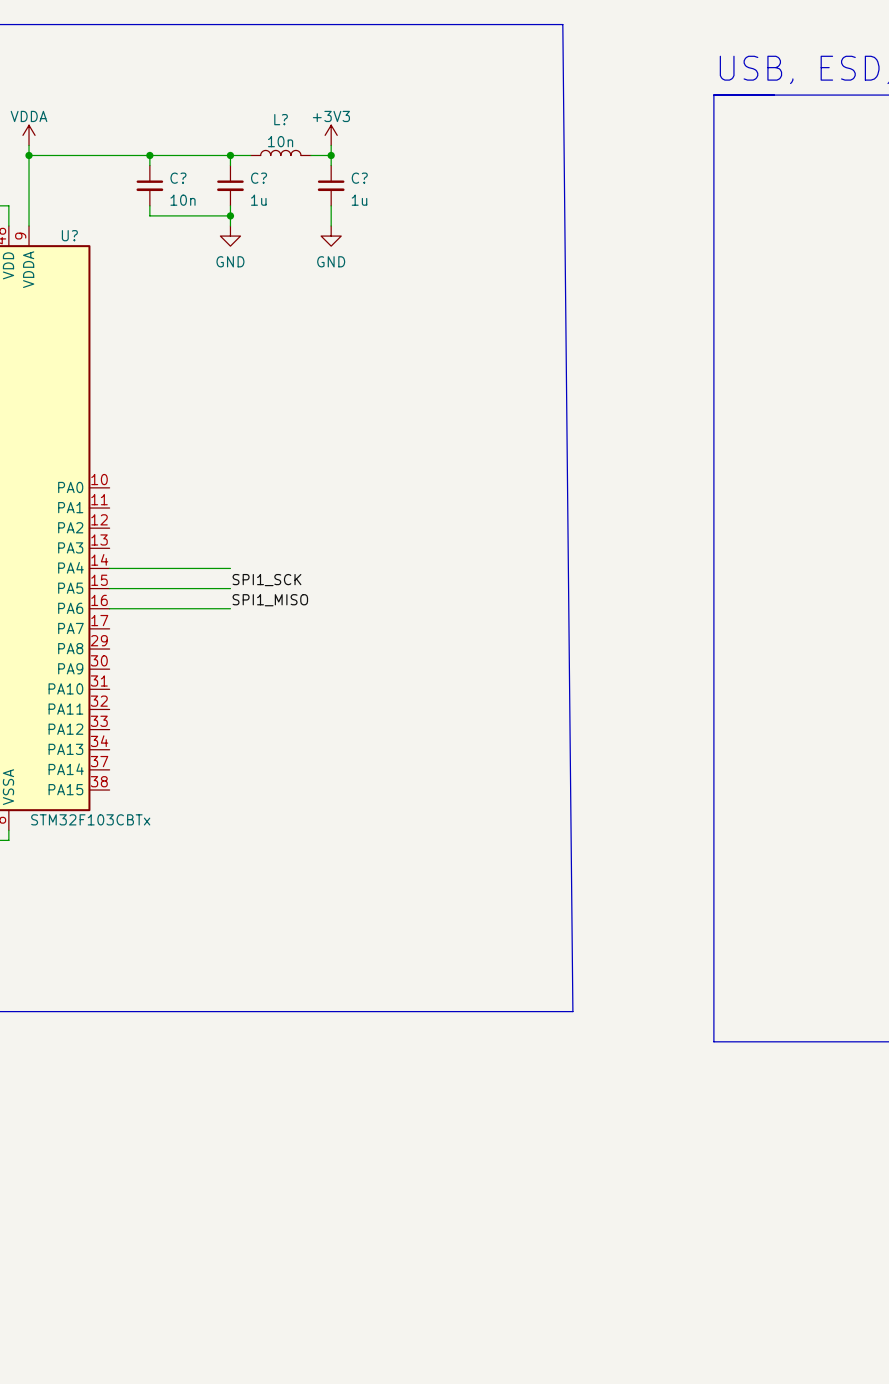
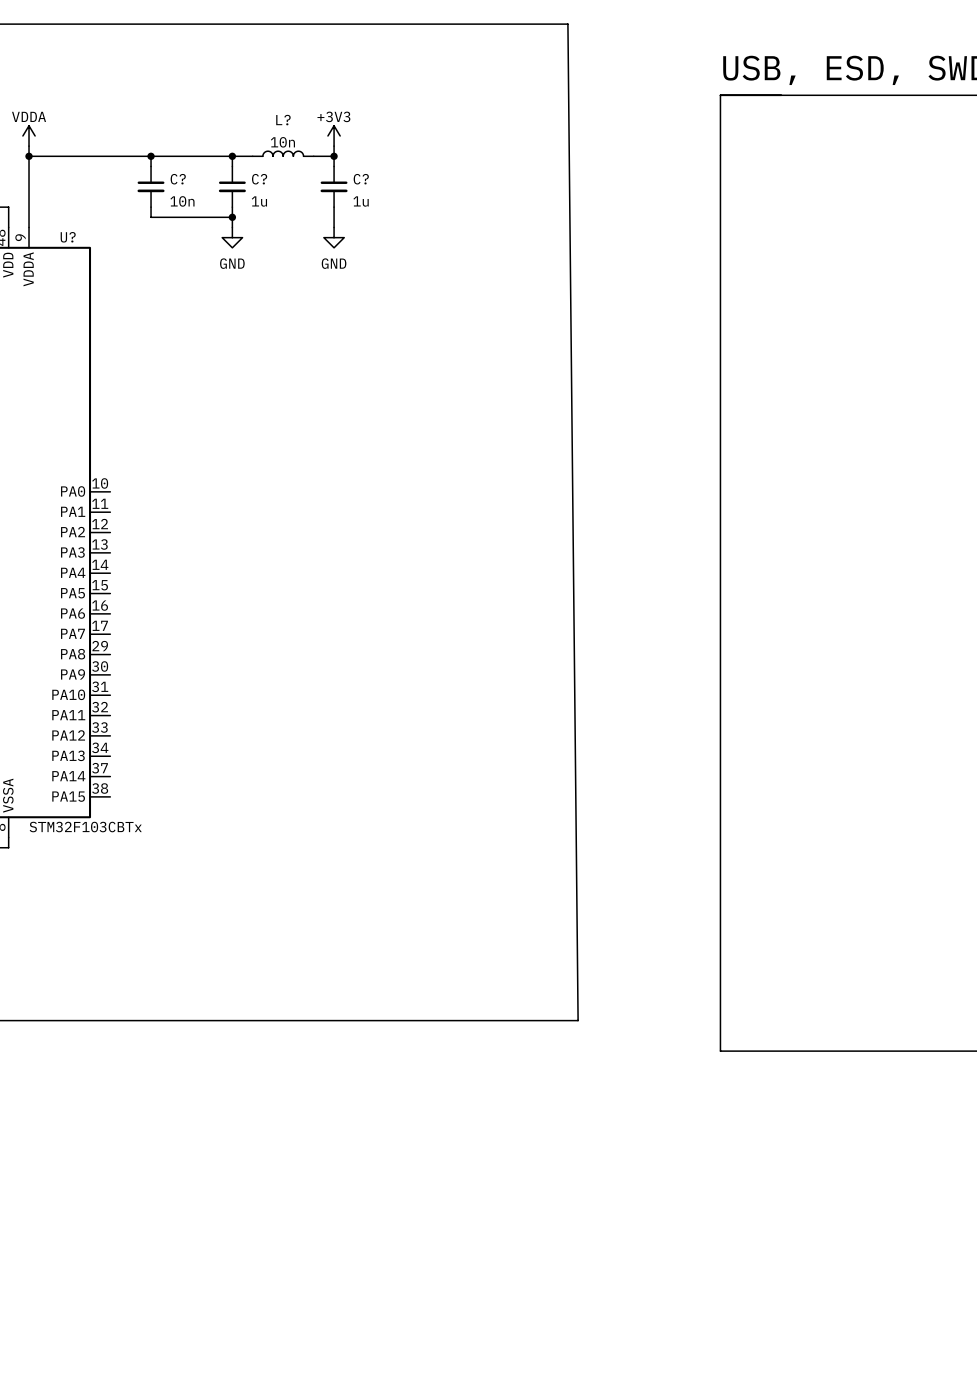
wire: (109, 568) (230, 568) -> none
label: SPI1_SCK (266, 580) -> none
wire: (109, 588) (230, 588) -> none
label: SPI1_MISO (270, 600) -> none
wire: (109, 608) (230, 608) -> none

